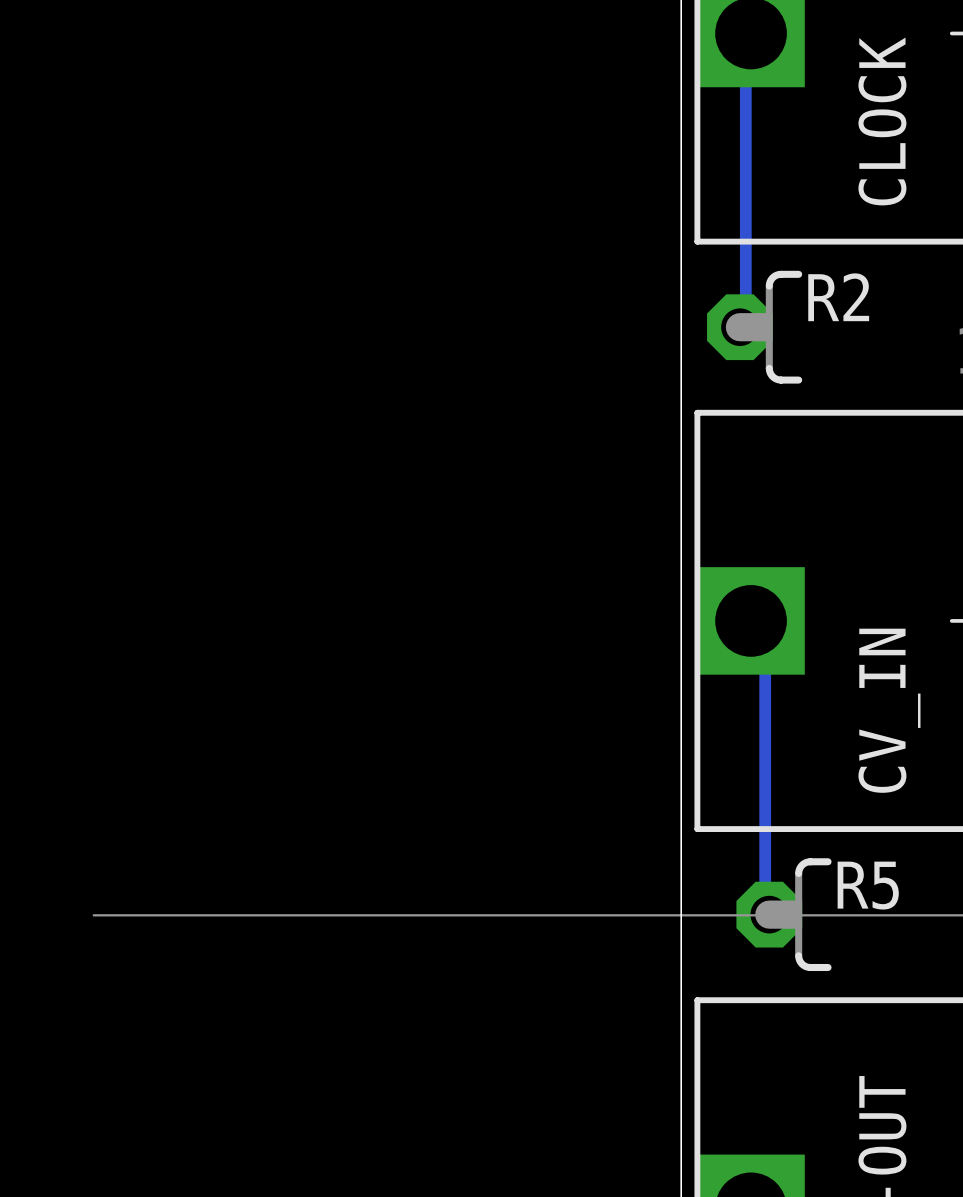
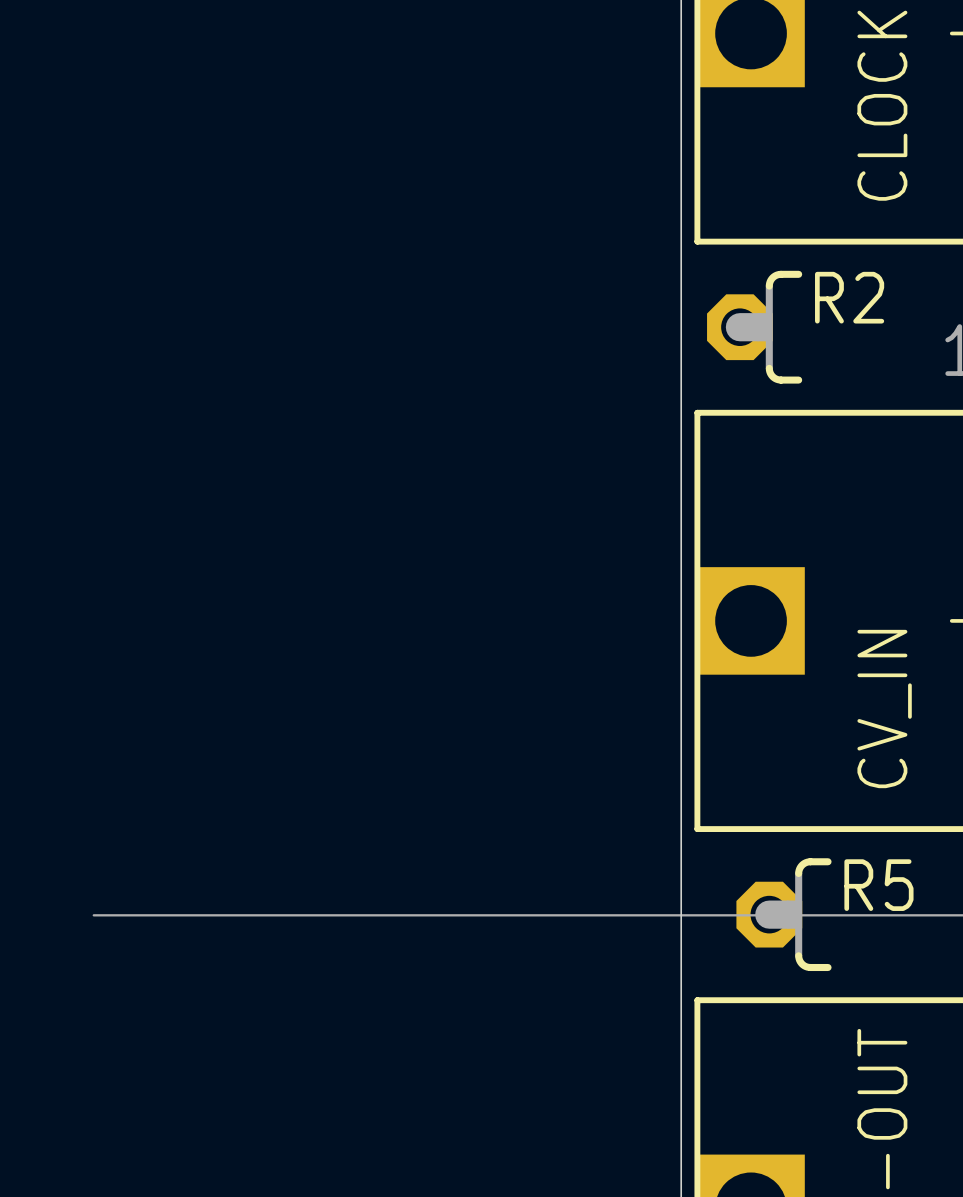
bottom track: (752, 31) (745, 37) (745, 321) (739, 327) -> none
bottom track: (751, 620) (752, 625) (765, 638) (765, 909) (769, 914) -> none

